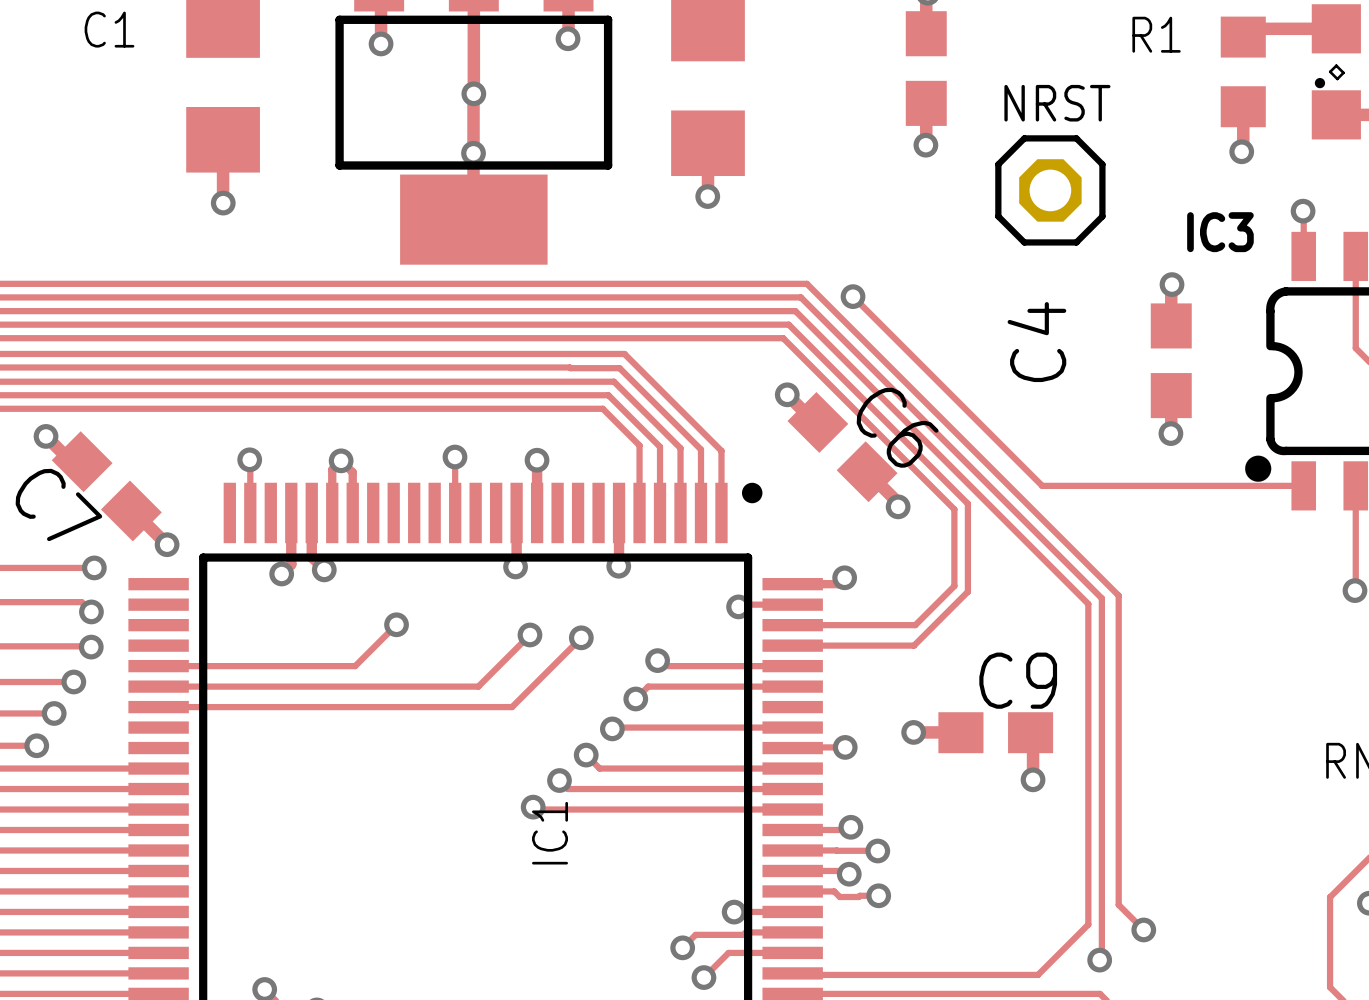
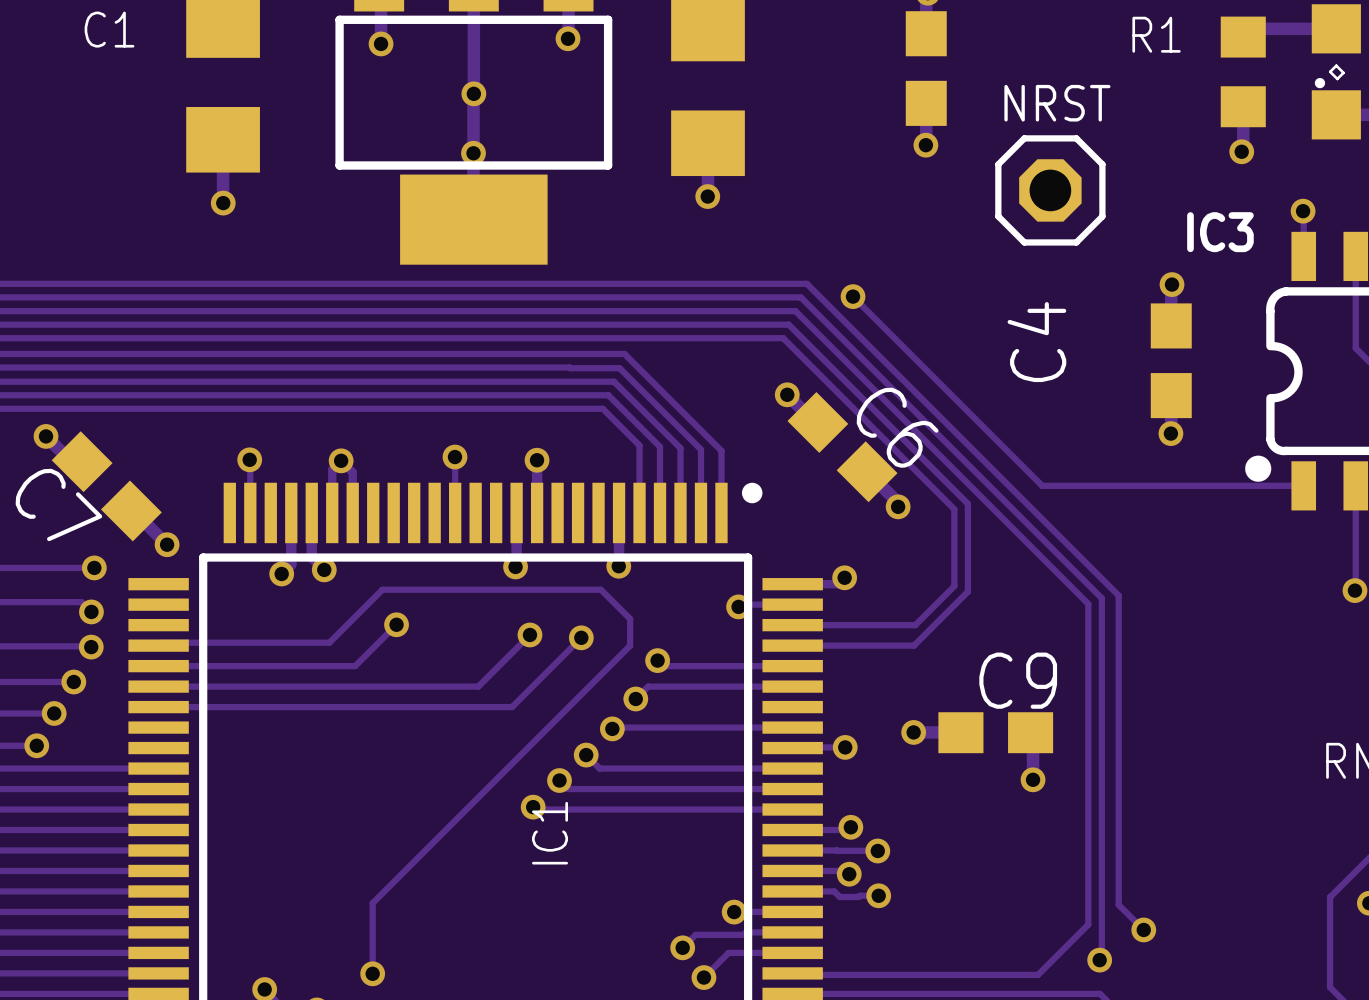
track: none -> (158, 645) (161, 642) (329, 642) (382, 589) (600, 589) (630, 618) (630, 645) (372, 903) (372, 973)
via: none -> (372, 973)

